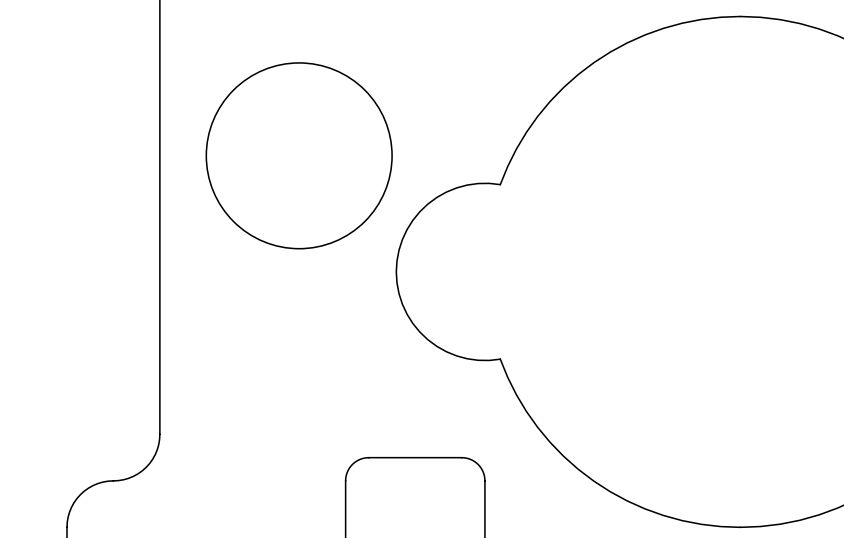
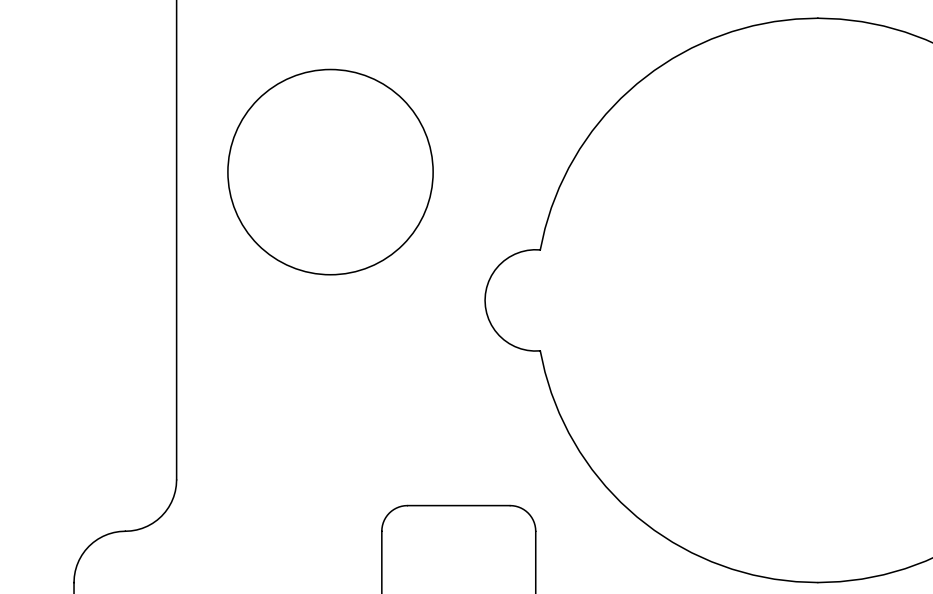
board edge: (740, 16) (701, 19) (663, 28) (627, 42) (593, 62) (563, 87) (537, 116) (516, 149) (500, 184) (478, 183) (456, 187) (436, 197) (419, 211) (402, 239) (396, 271) (402, 304) (419, 332) (436, 346) (456, 355) (478, 360) (500, 359) (516, 394) (537, 427) (563, 456) (593, 481) (627, 500) (663, 515) (701, 524) (740, 527) -> (817, 18) (774, 21) (732, 31) (711, 39) (672, 58) (637, 83) (605, 114) (579, 149) (559, 187) (551, 207) (540, 249) (521, 251) (504, 260) (491, 275) (486, 287) (485, 300) (486, 313) (491, 325) (504, 339) (521, 348) (540, 350) (551, 393) (568, 432) (592, 469) (605, 486) (637, 517) (672, 542) (691, 552) (732, 569) (774, 579) (817, 582)

